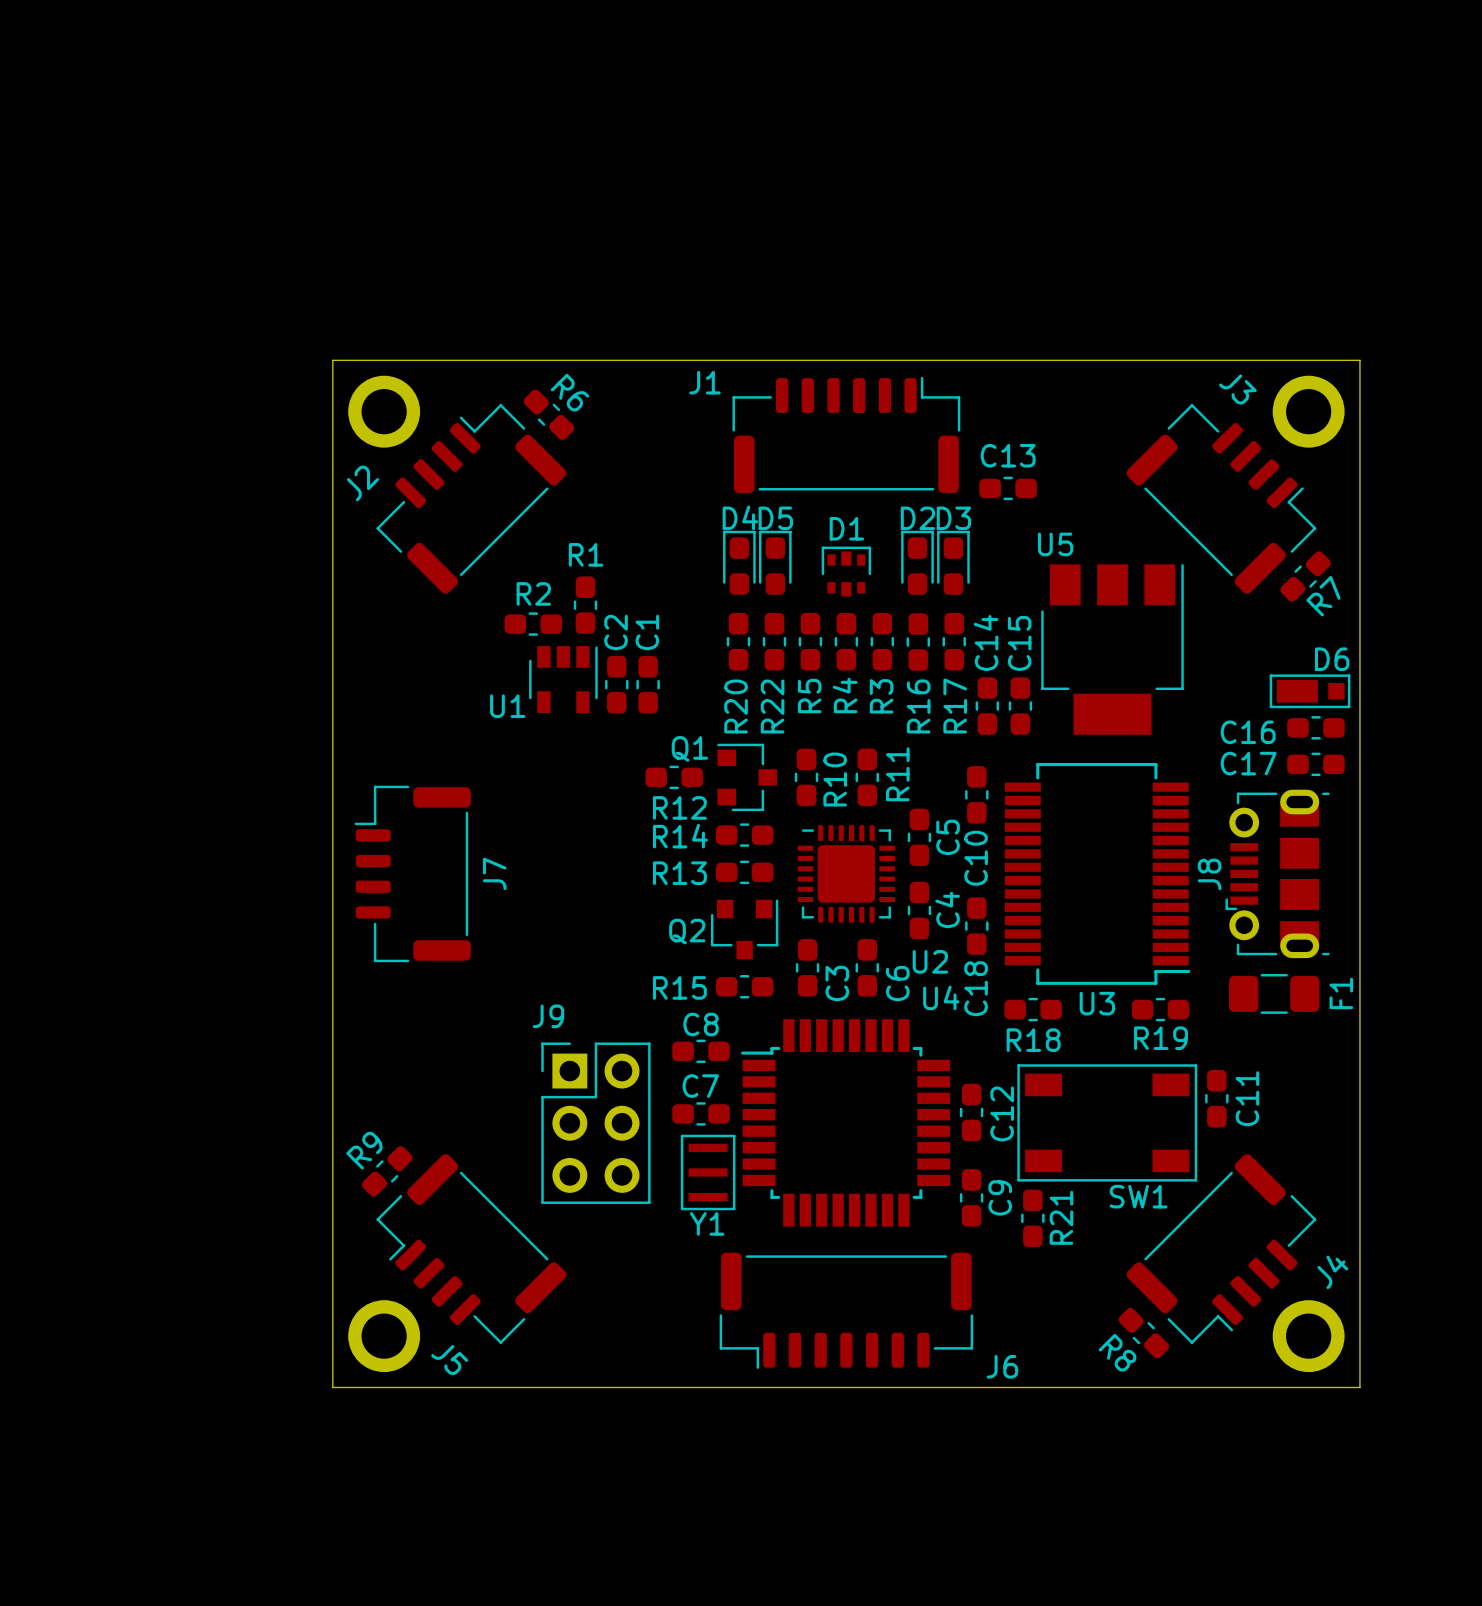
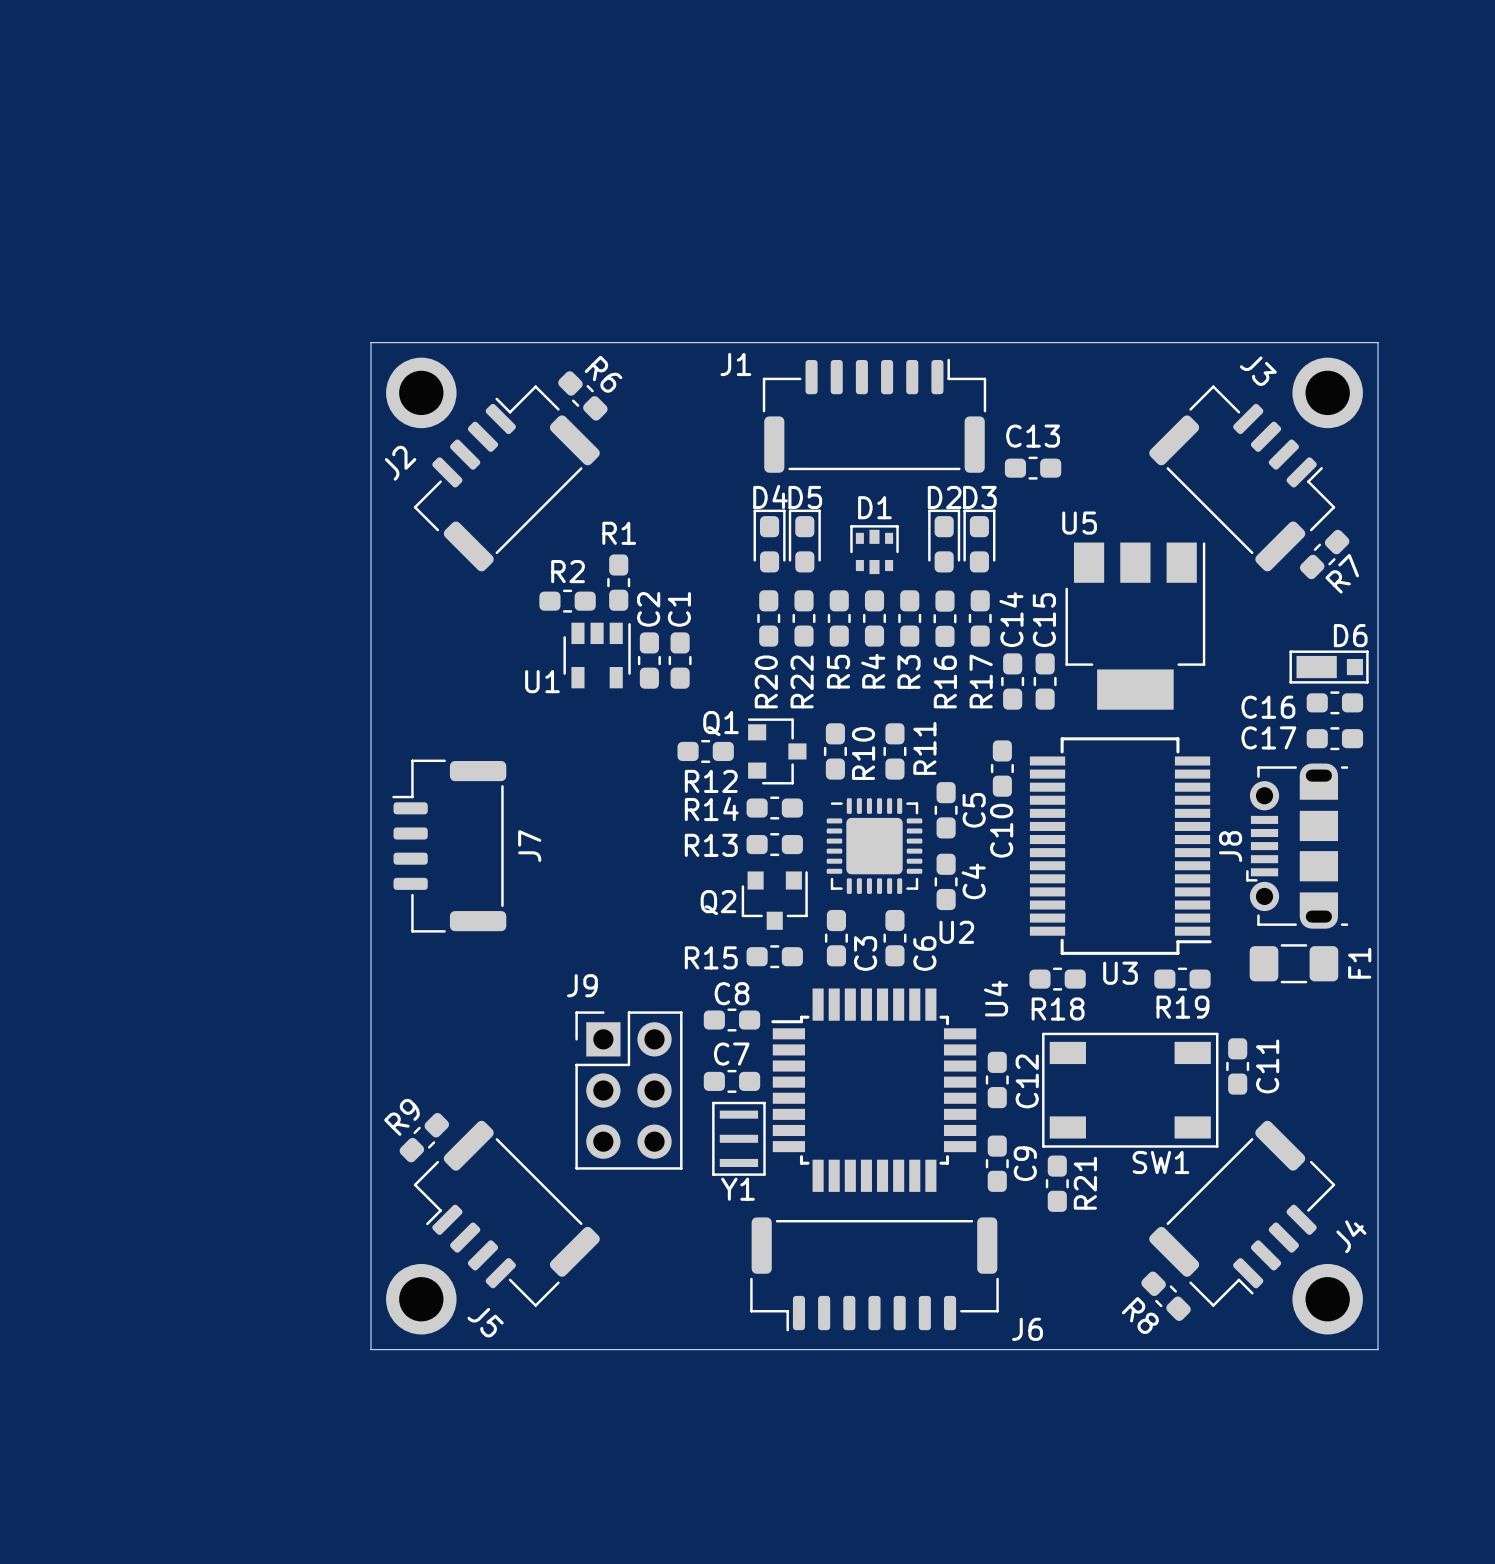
C18: (976, 926) -> none
U4 name rotation: 0° (941, 997) -> 90° counterclockwise (996, 998)

